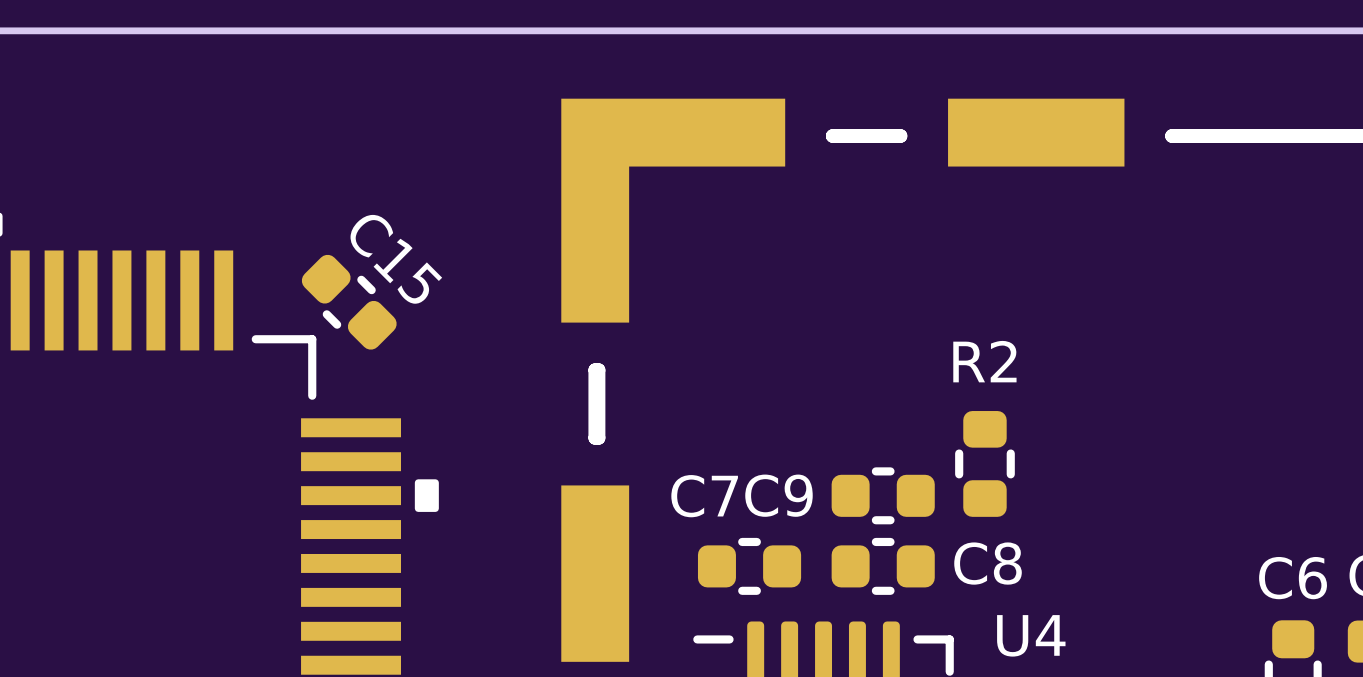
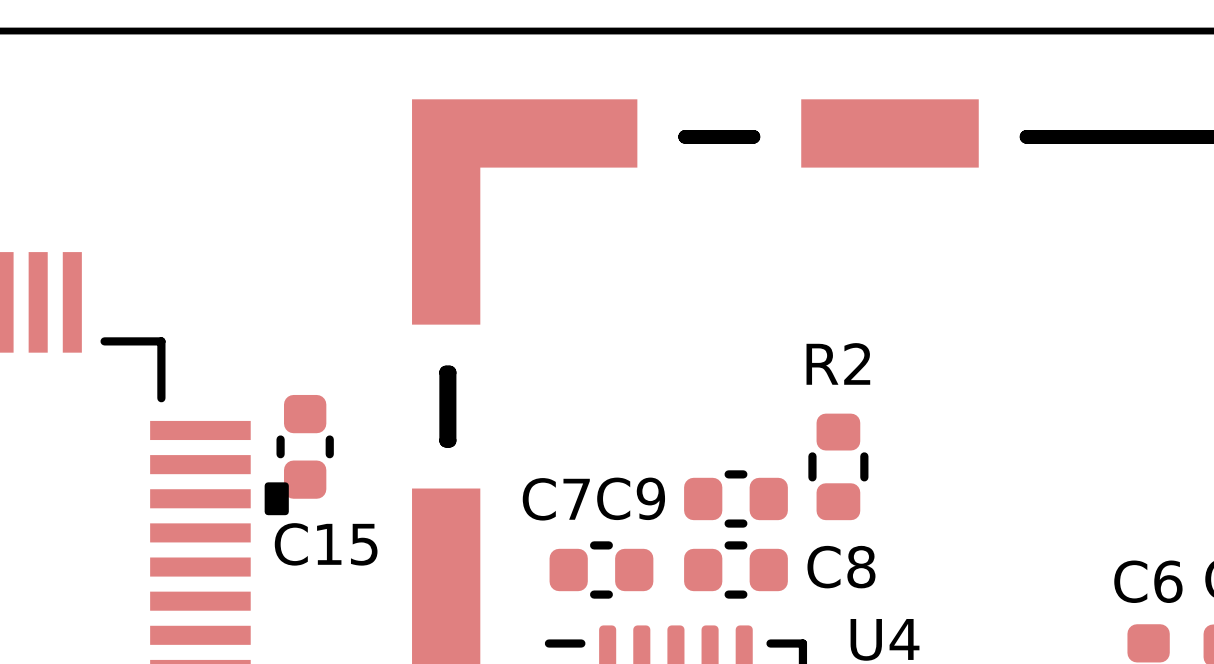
C15 rotation: 0° (349, 302) -> 45° clockwise (305, 446)
C15 position: (349, 302) -> (305, 446)

